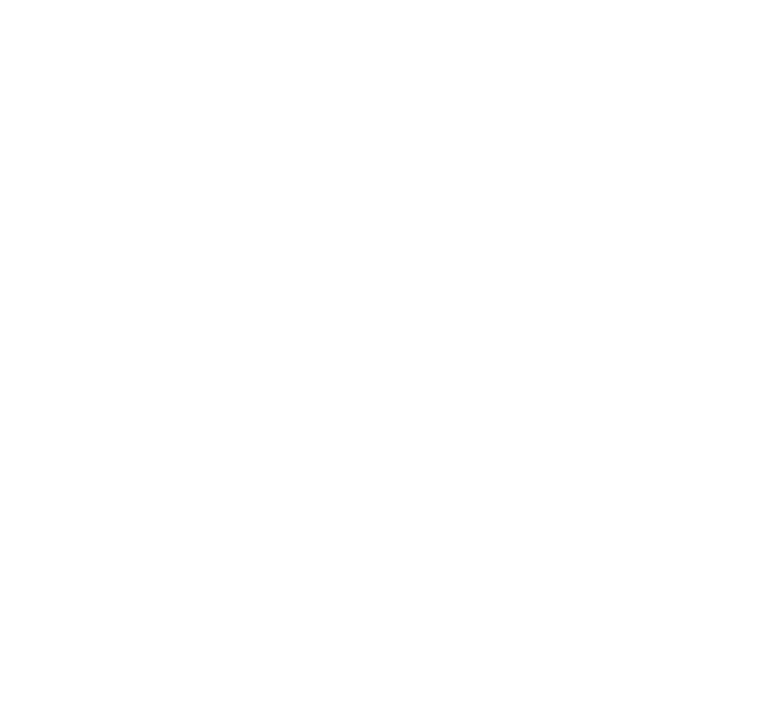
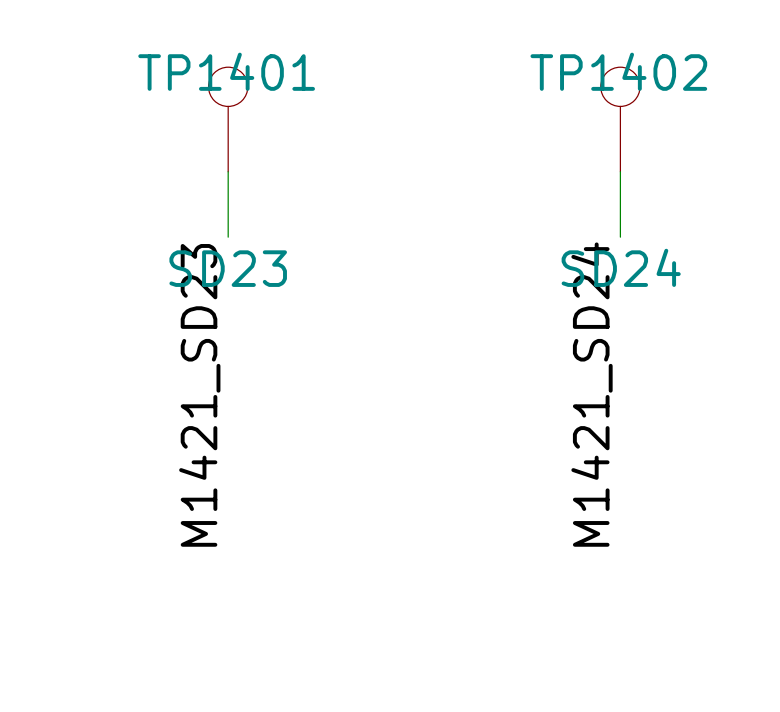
TP1401: none -> SD23 (228, 119)
TP1402: none -> SD24 (620, 119)
wire: none -> (228, 171) (228, 237)
wire: none -> (620, 171) (620, 237)
label: none -> M1421_SD24 (592, 394)
label: none -> M1421_SD23 (199, 395)

